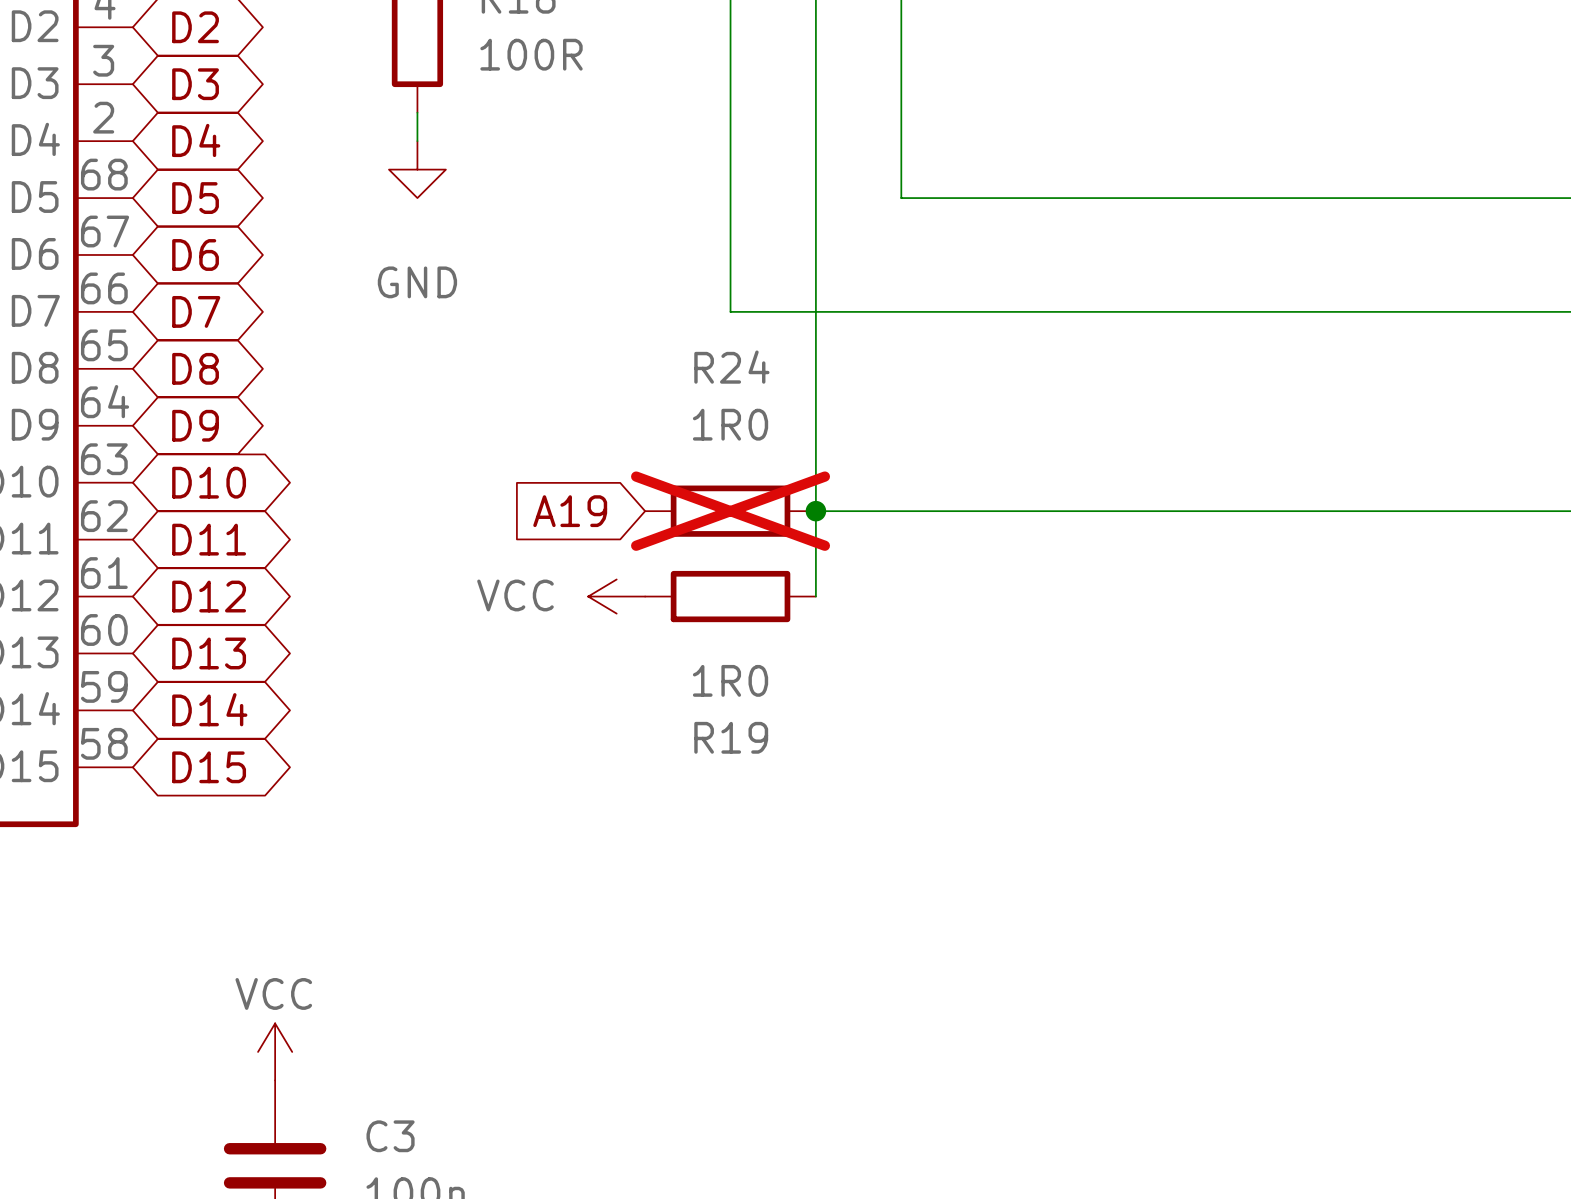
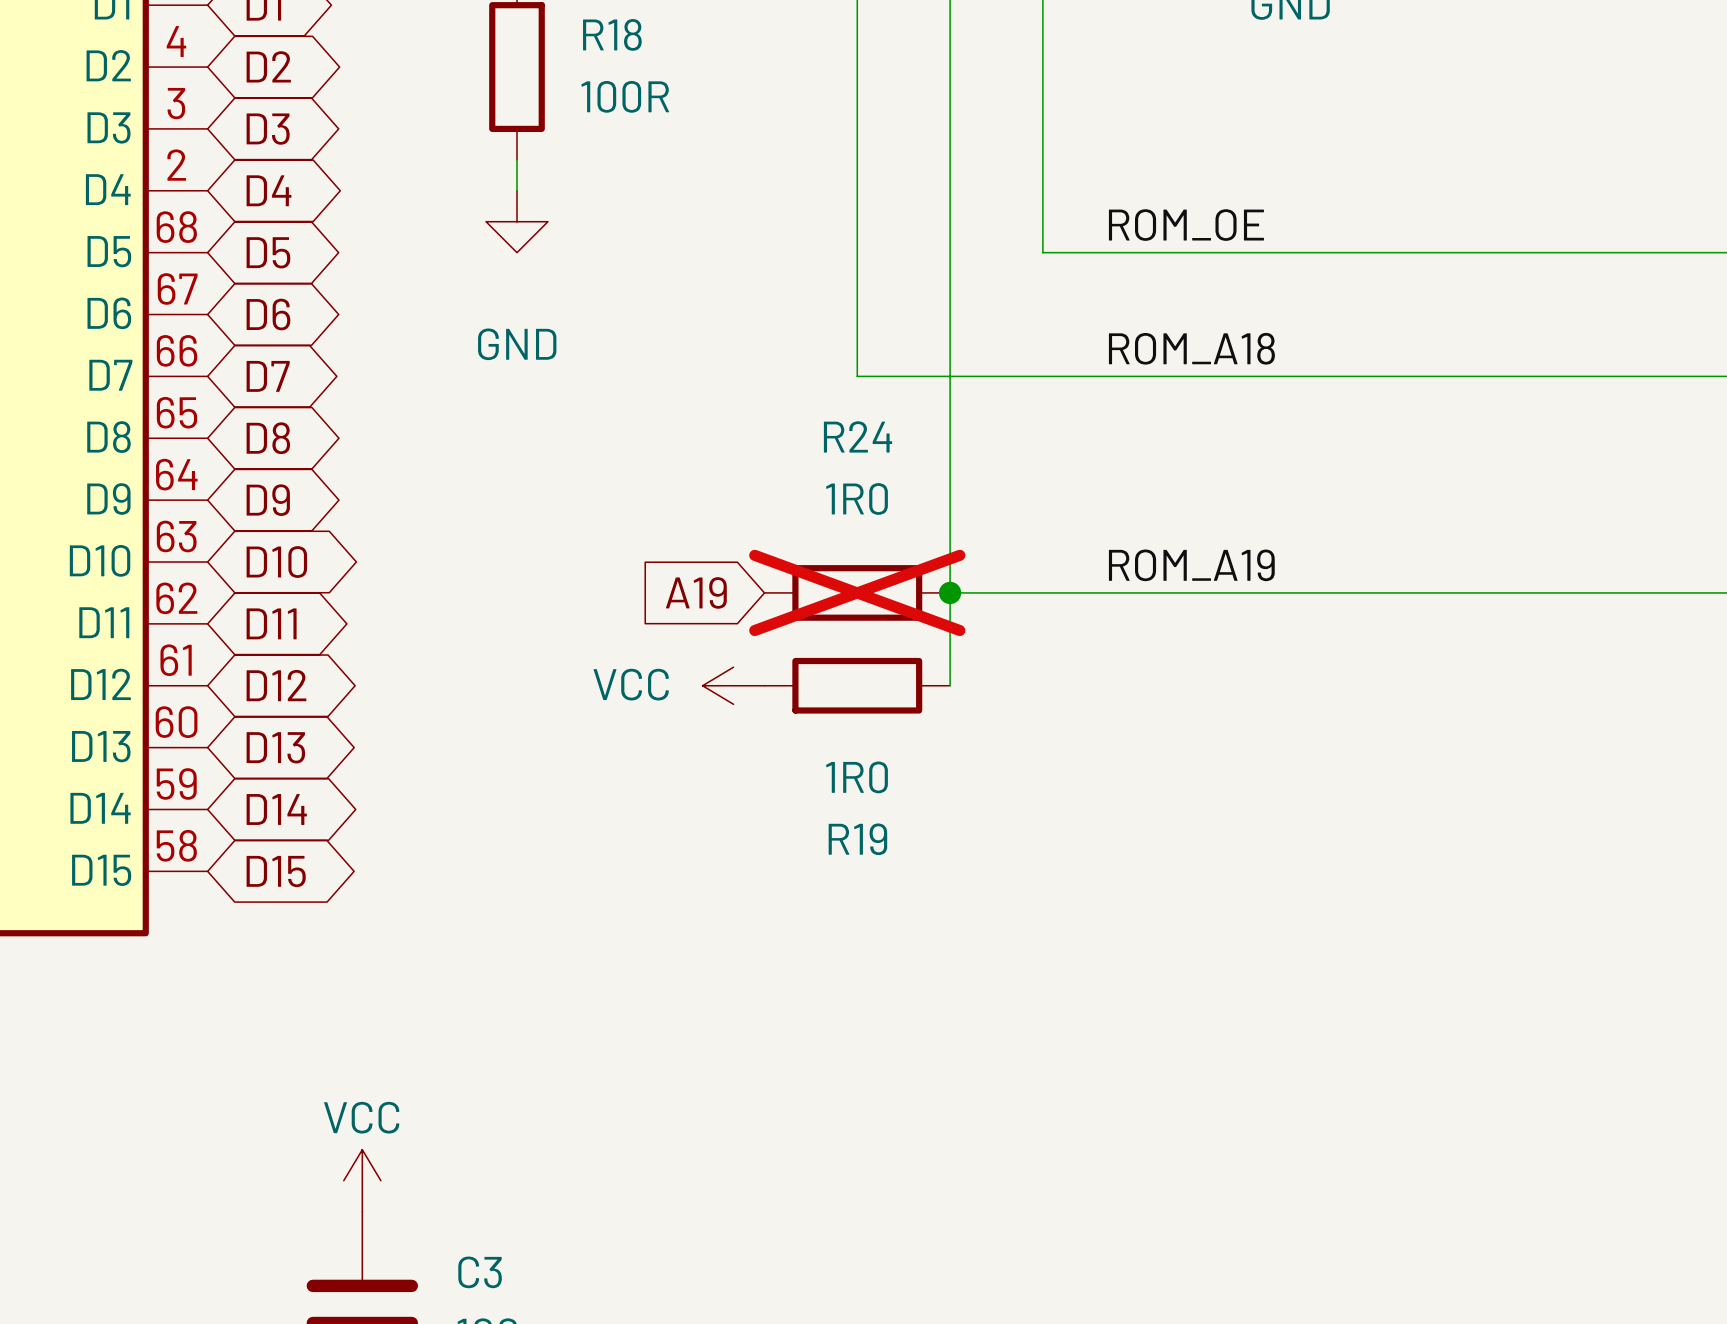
label: none -> ROM_OE (1186, 225)
label: none -> ROM_A18 (1191, 348)
label: none -> ROM_A19 (1191, 565)

